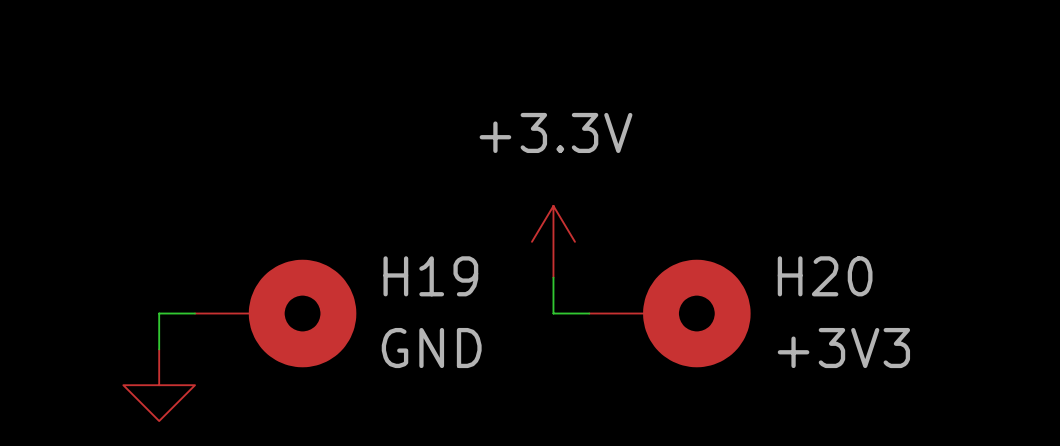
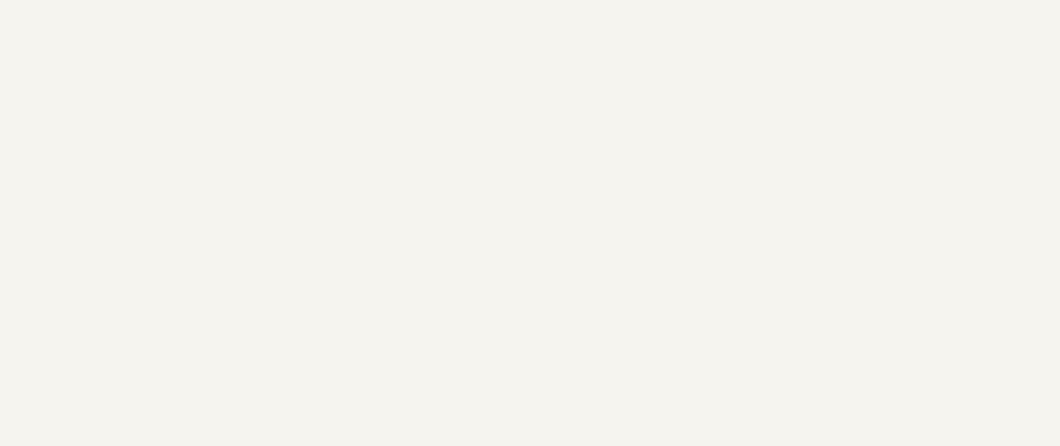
power symbol: +3.3V (553, 241) -> none
wire: (553, 277) (553, 313) (589, 313) -> none
wire: (195, 313) (159, 313) (159, 349) -> none
H19: GND (275, 313) -> none
H20: +3V3 (669, 313) -> none
power symbol: (159, 385) -> none

